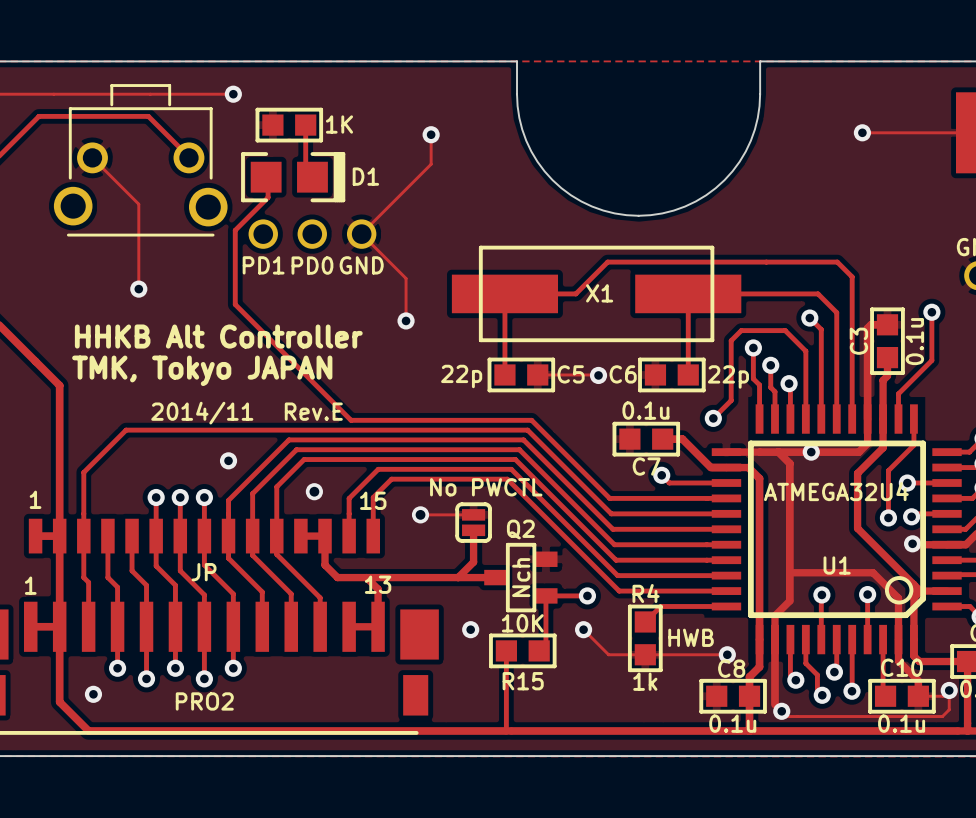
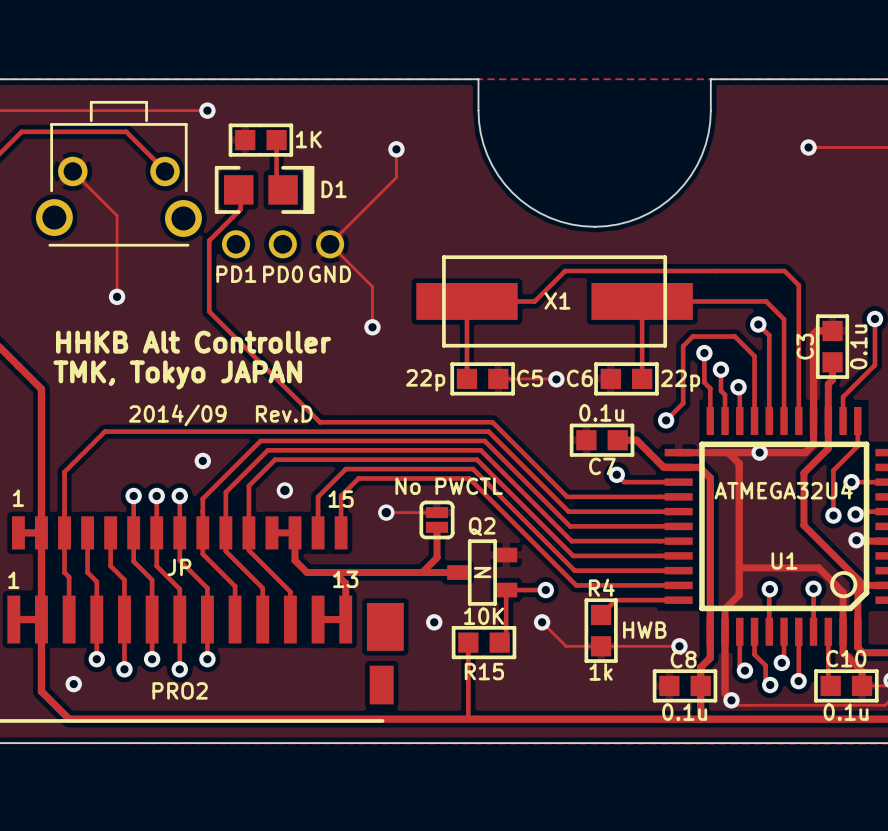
text: Rev.E (313, 411) -> Rev.D (284, 413)
text: 2014/11 (202, 413) -> 2014/09 (177, 415)
Q2 value: Nch (521, 577) -> N (482, 572)

